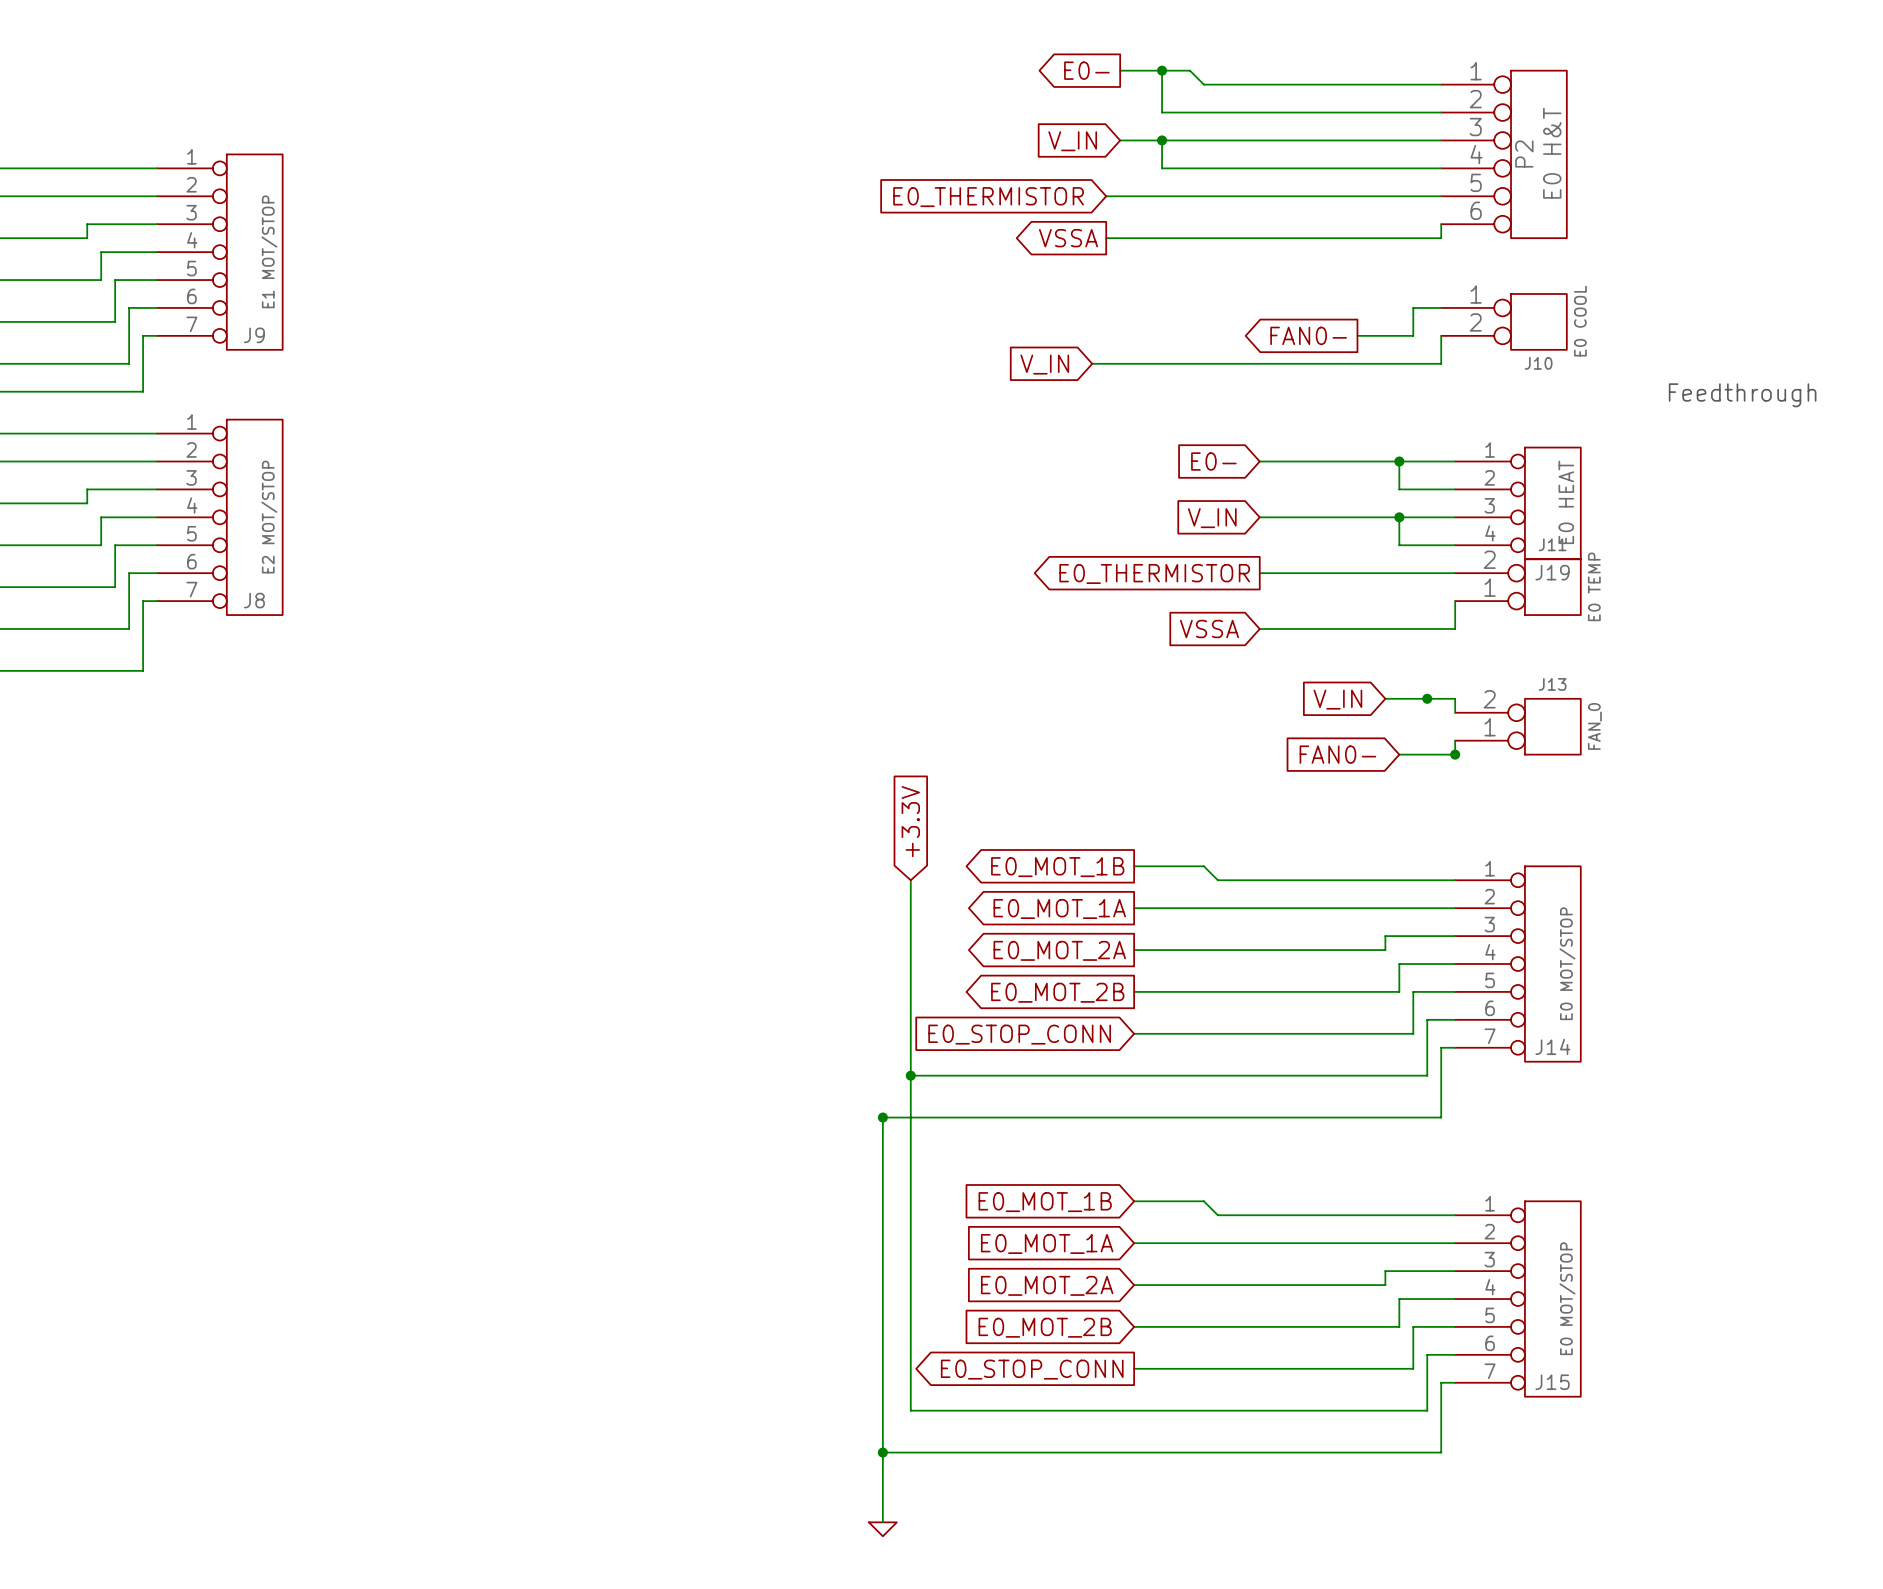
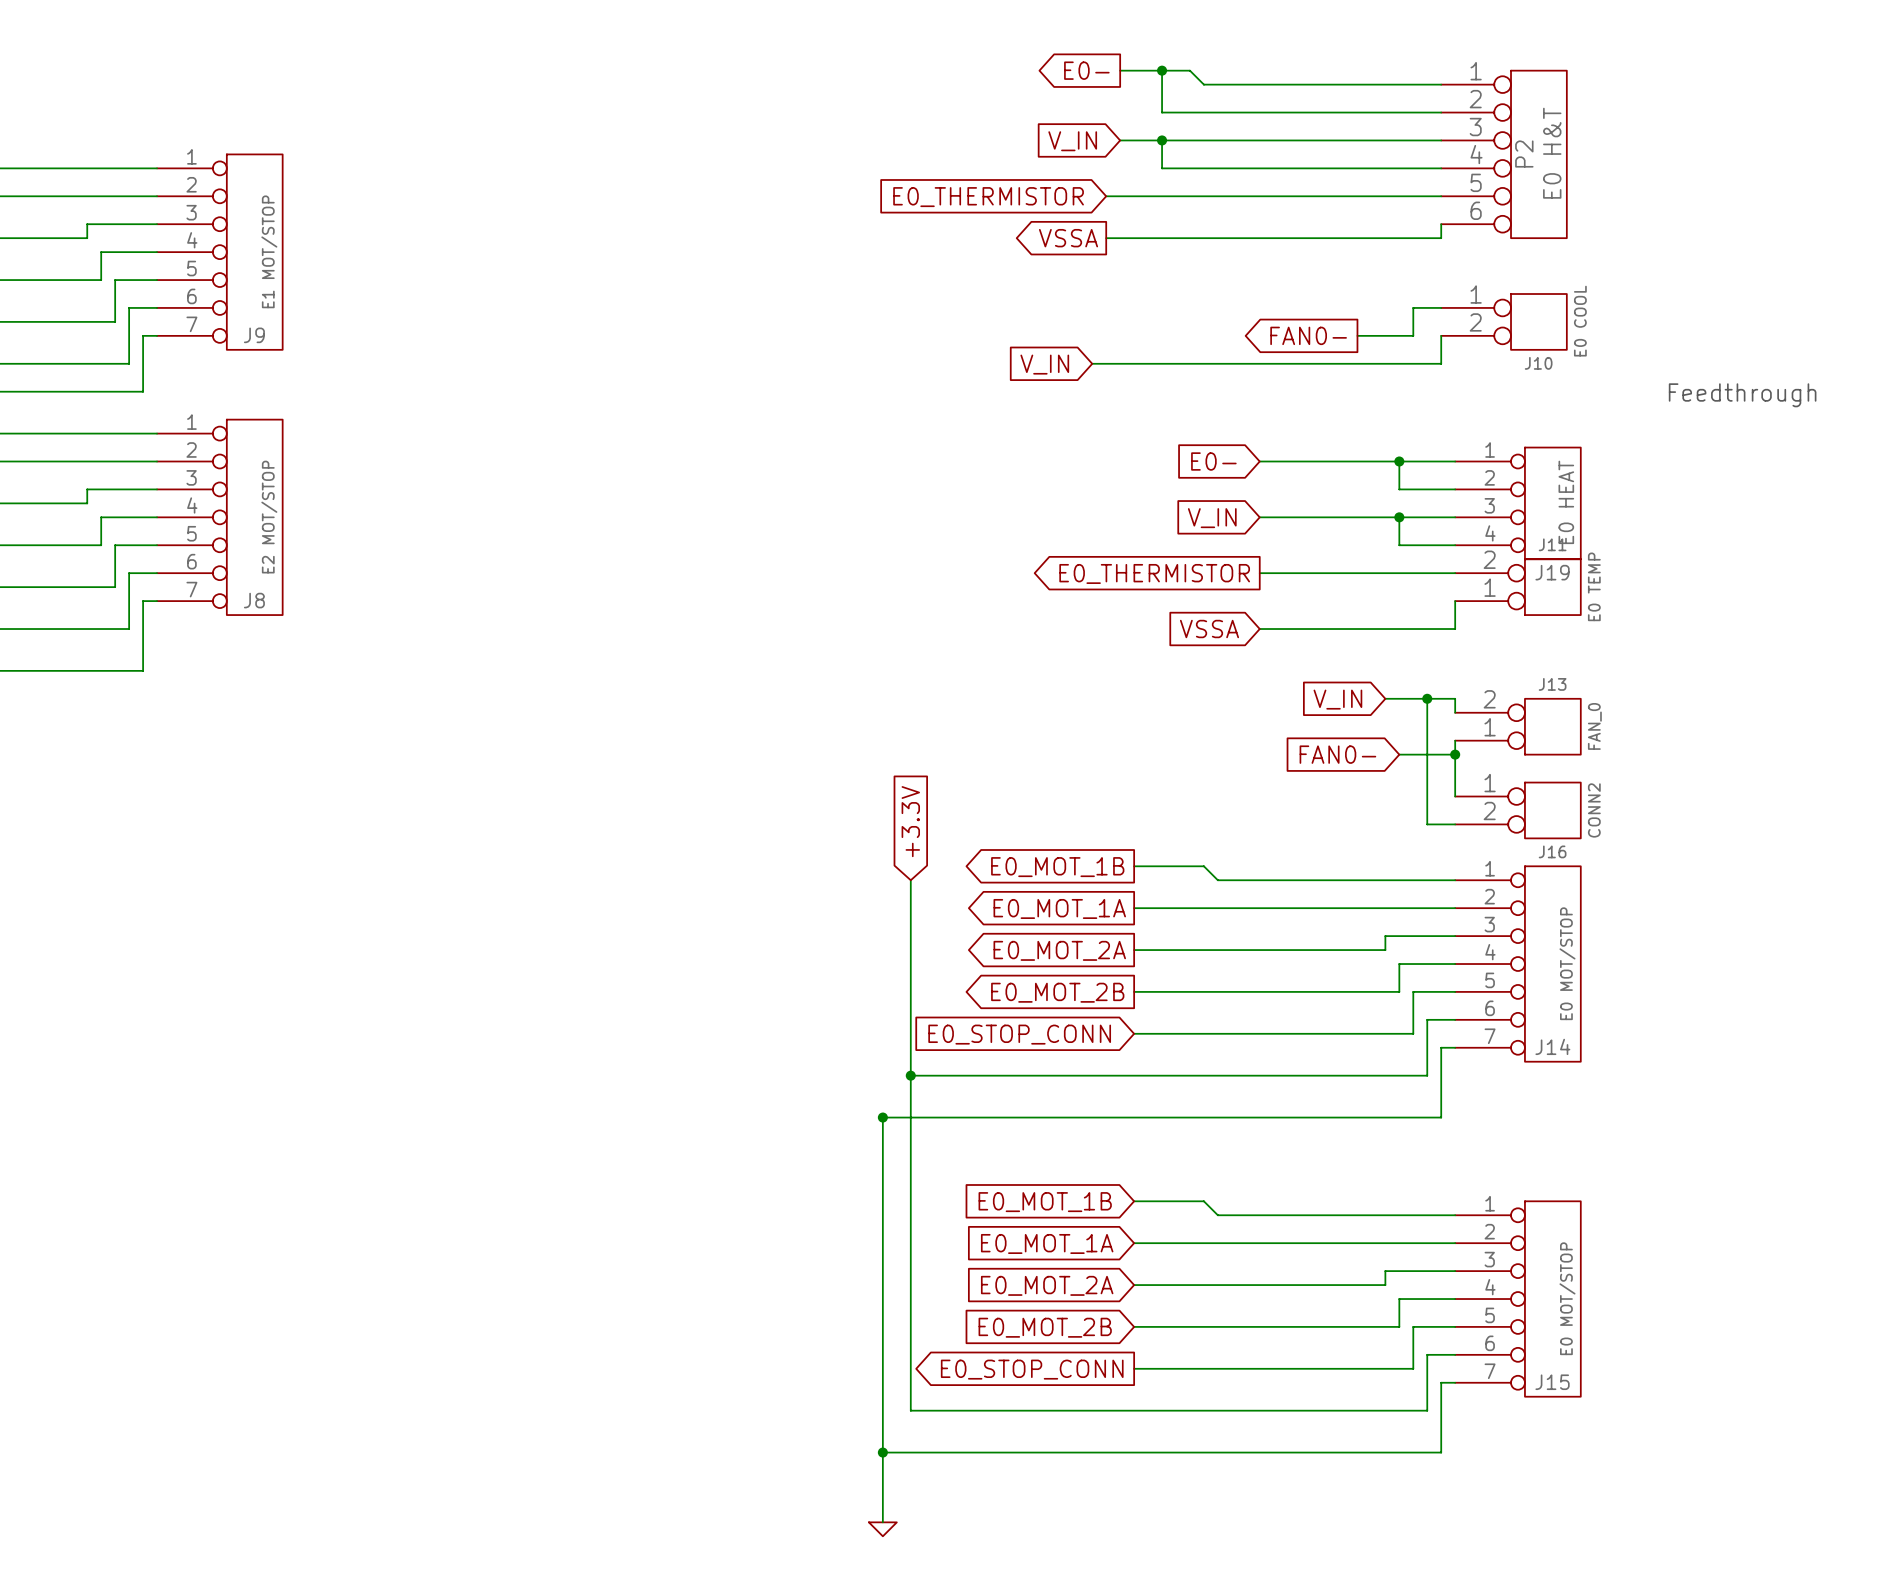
wire: none -> (1427, 698) (1427, 824) (1455, 824)
wire: none -> (1455, 754) (1455, 796)
J16: none -> CONN2 (1517, 810)

